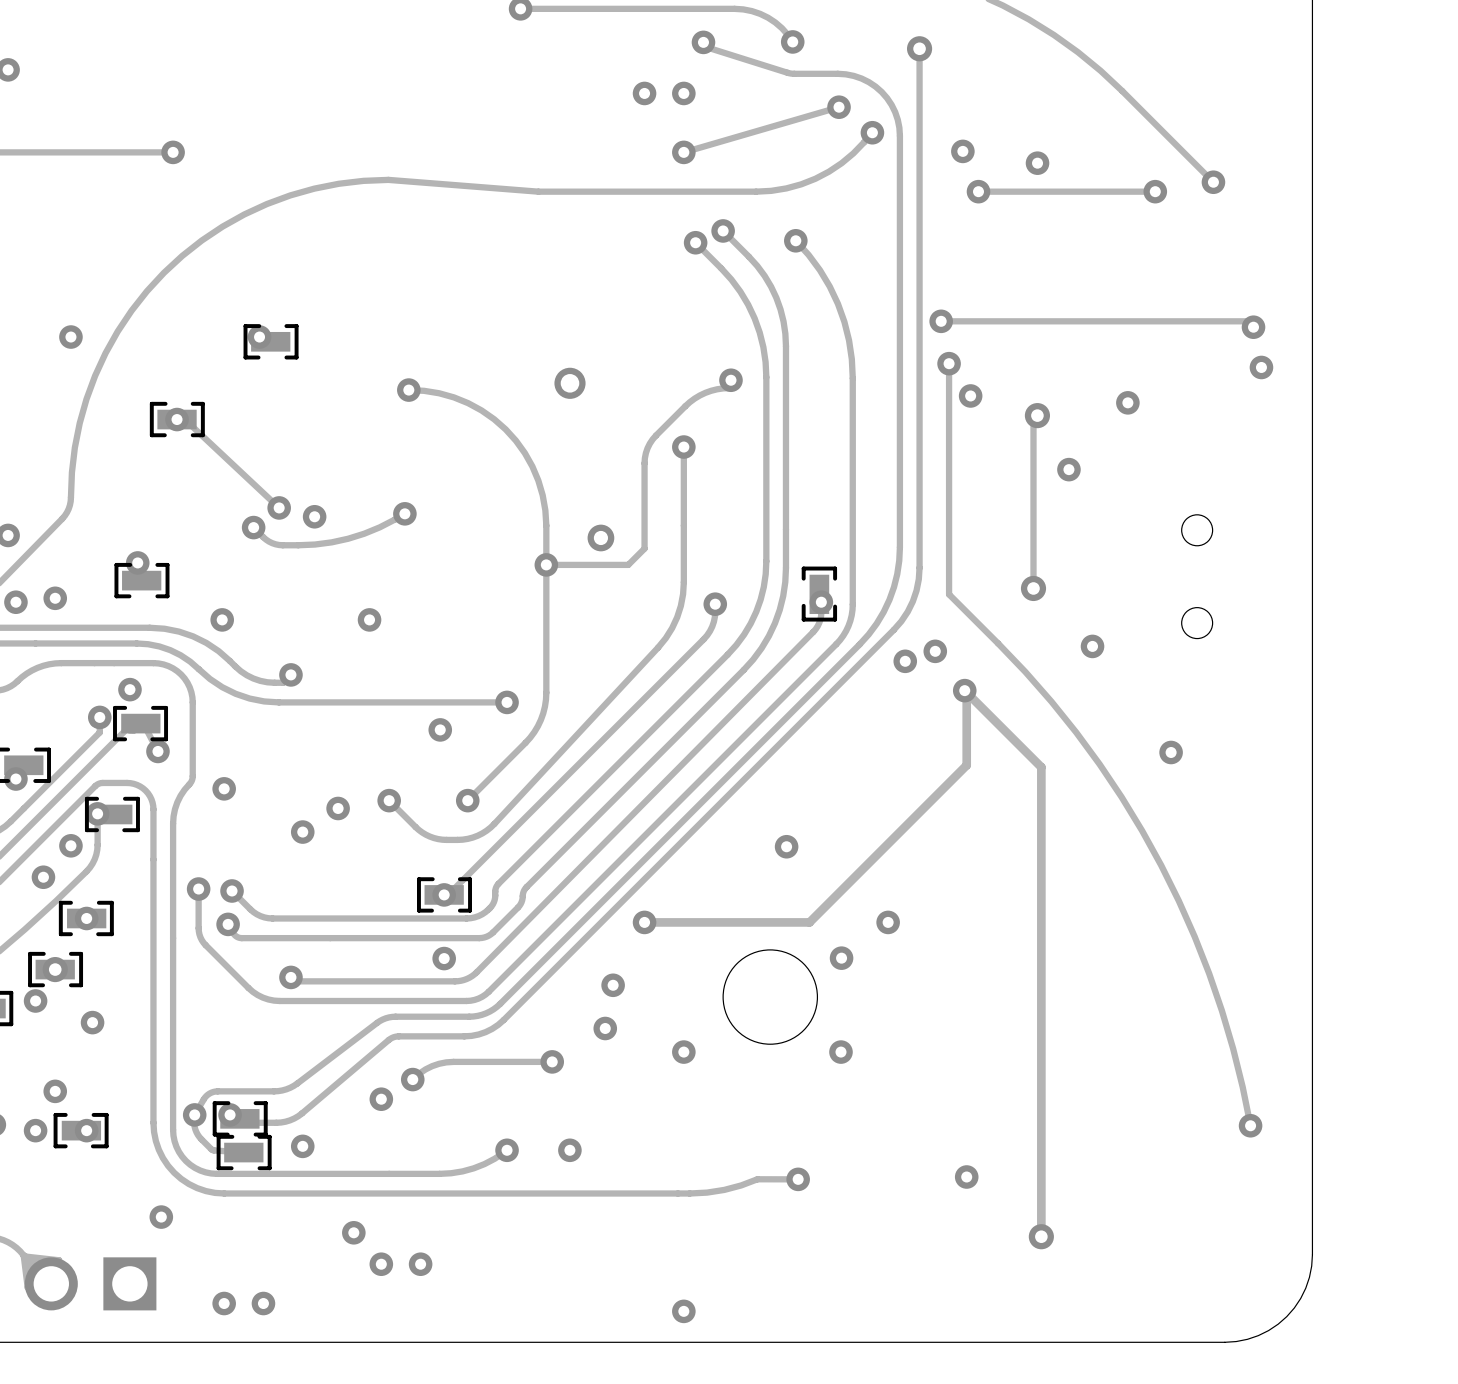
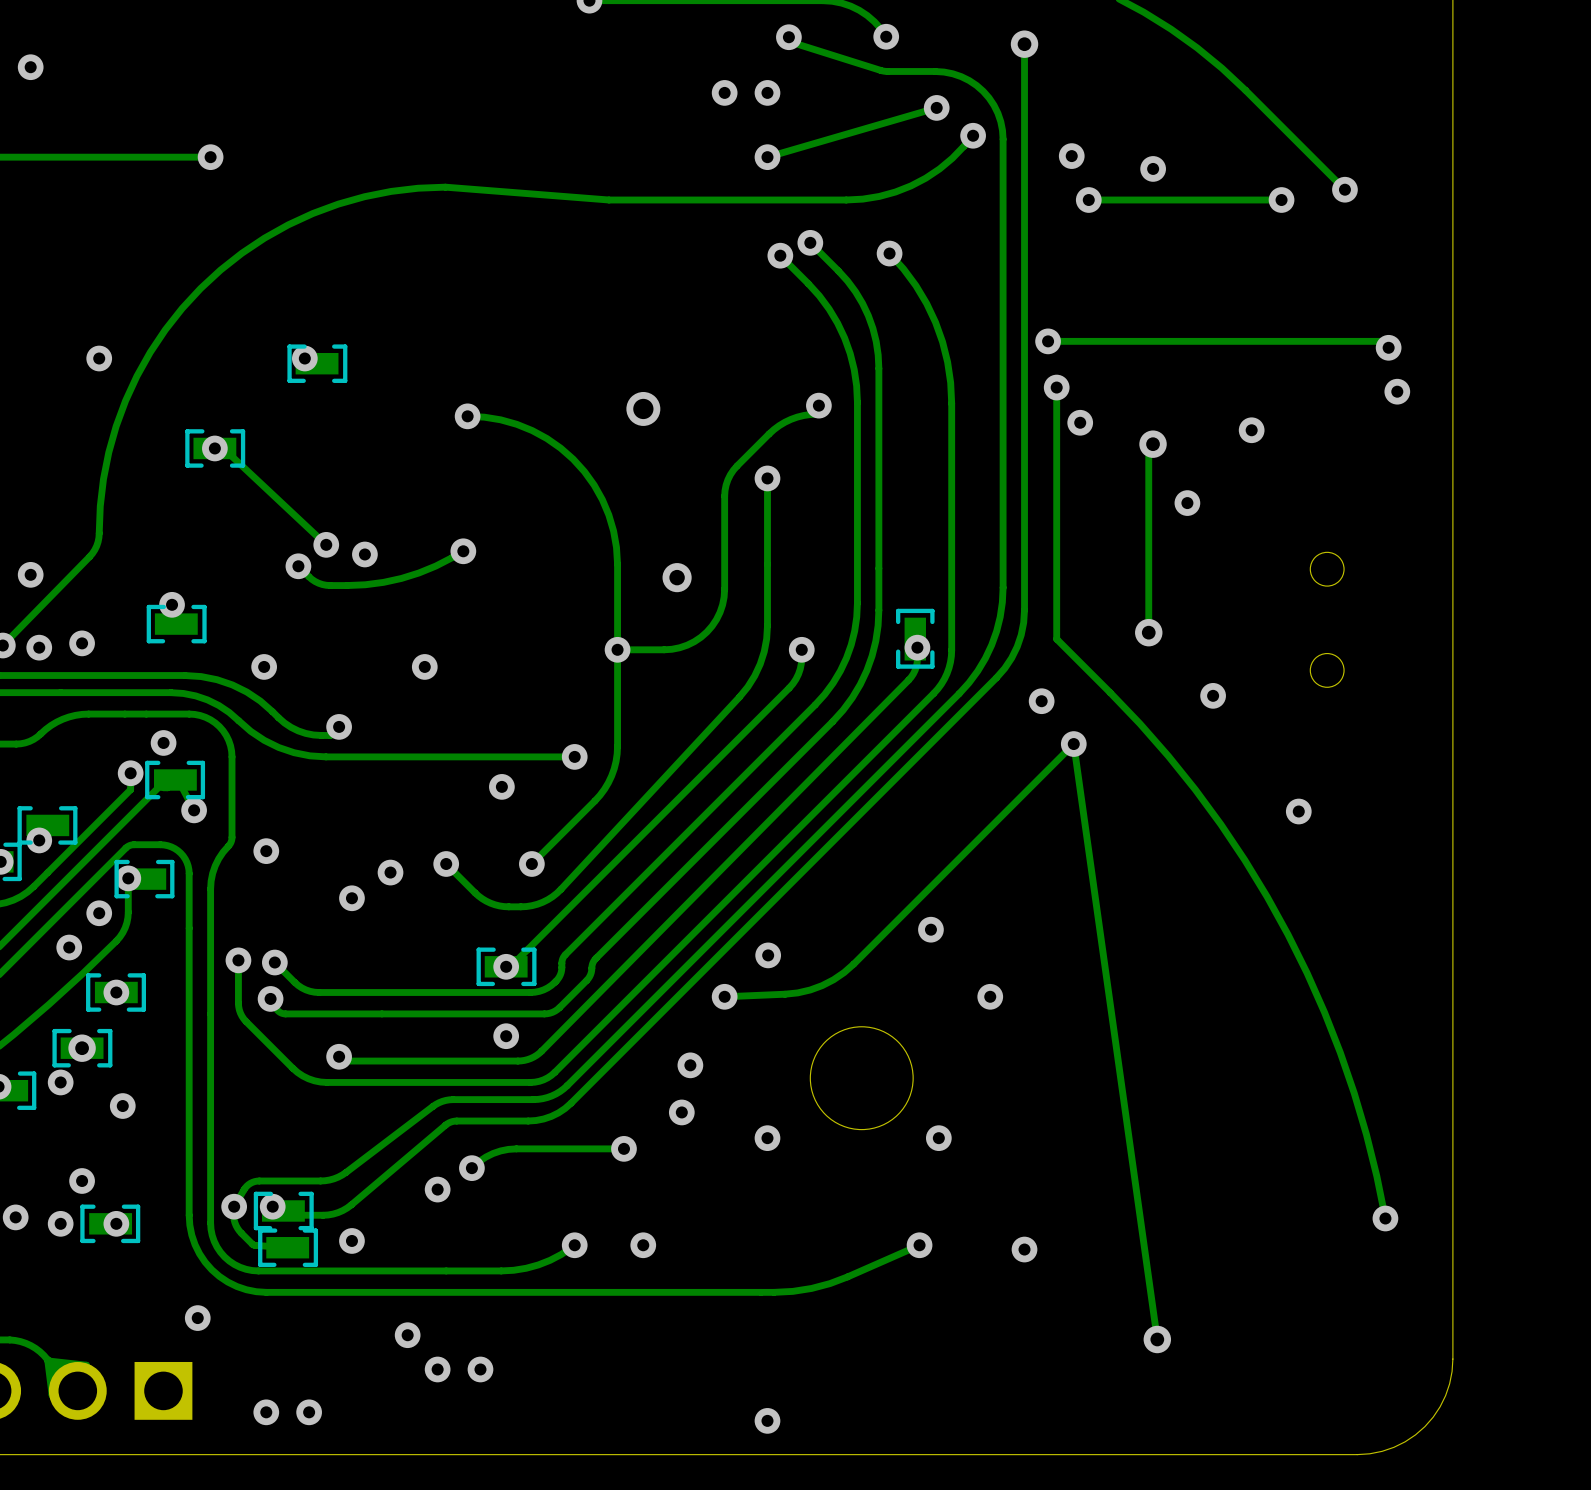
track: (644, 548) (628, 564) (546, 564) -> (724, 589) (722, 604) (716, 619) (706, 632) (694, 641) (671, 649) (617, 649)
via position: (546, 564) -> (617, 649)
via: (905, 661) -> none
track: (964, 690) (1041, 767) (1041, 1236) -> (724, 996) (797, 992) (822, 985) (844, 972) (1073, 744) (1157, 1339)
track: (966, 692) (966, 765) (809, 922) (644, 922) -> none
via: (786, 846) -> none
via: none -> (930, 929)
via: none -> (768, 955)
via: (841, 958) -> none
via position: (966, 1177) -> (1024, 1249)
track: (798, 1179) (757, 1179) -> (919, 1245) (847, 1276)
via position: (798, 1179) -> (919, 1245)

